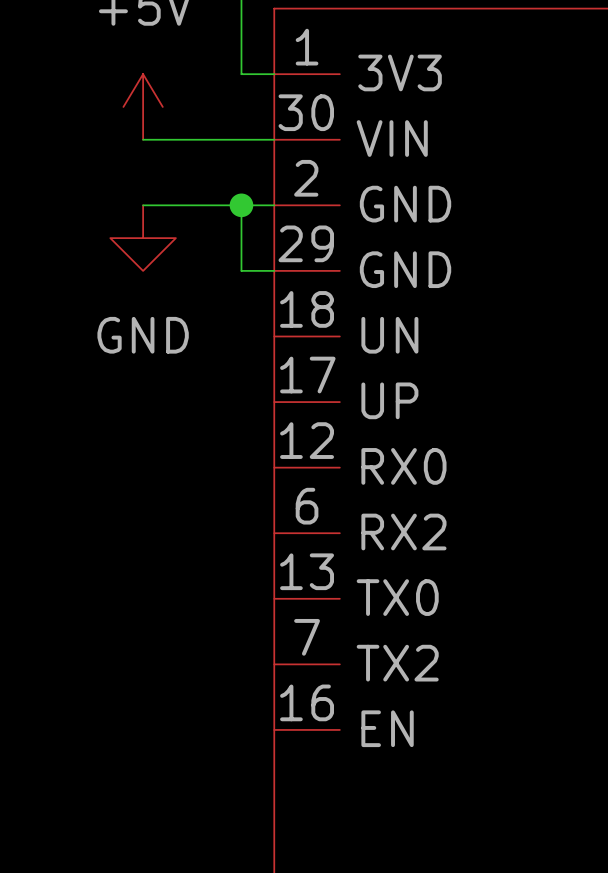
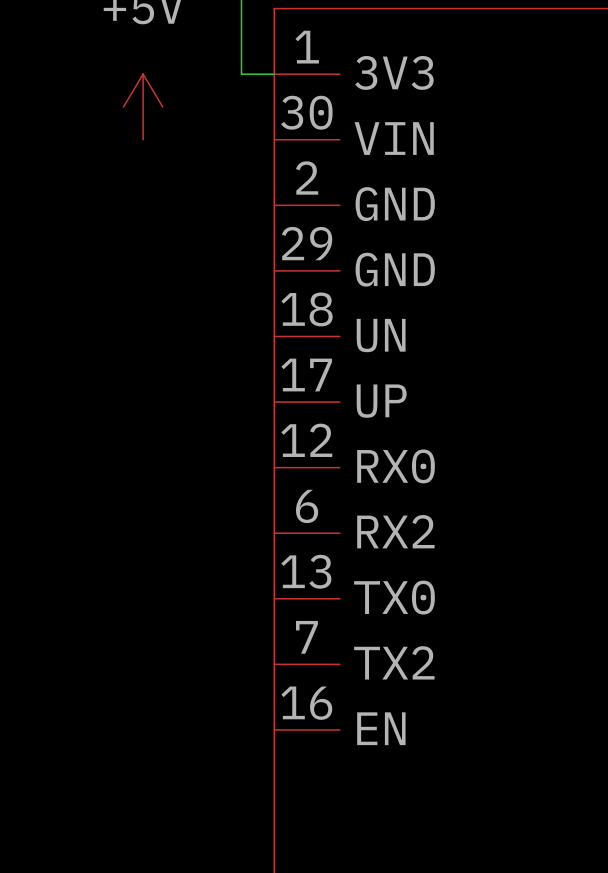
wire: (143, 139) (274, 139) -> none
wire: (143, 205) (274, 205) -> none
wire: (241, 205) (241, 270) (274, 270) -> none
junction: (241, 205) -> none
power symbol: GND (143, 238) -> none

